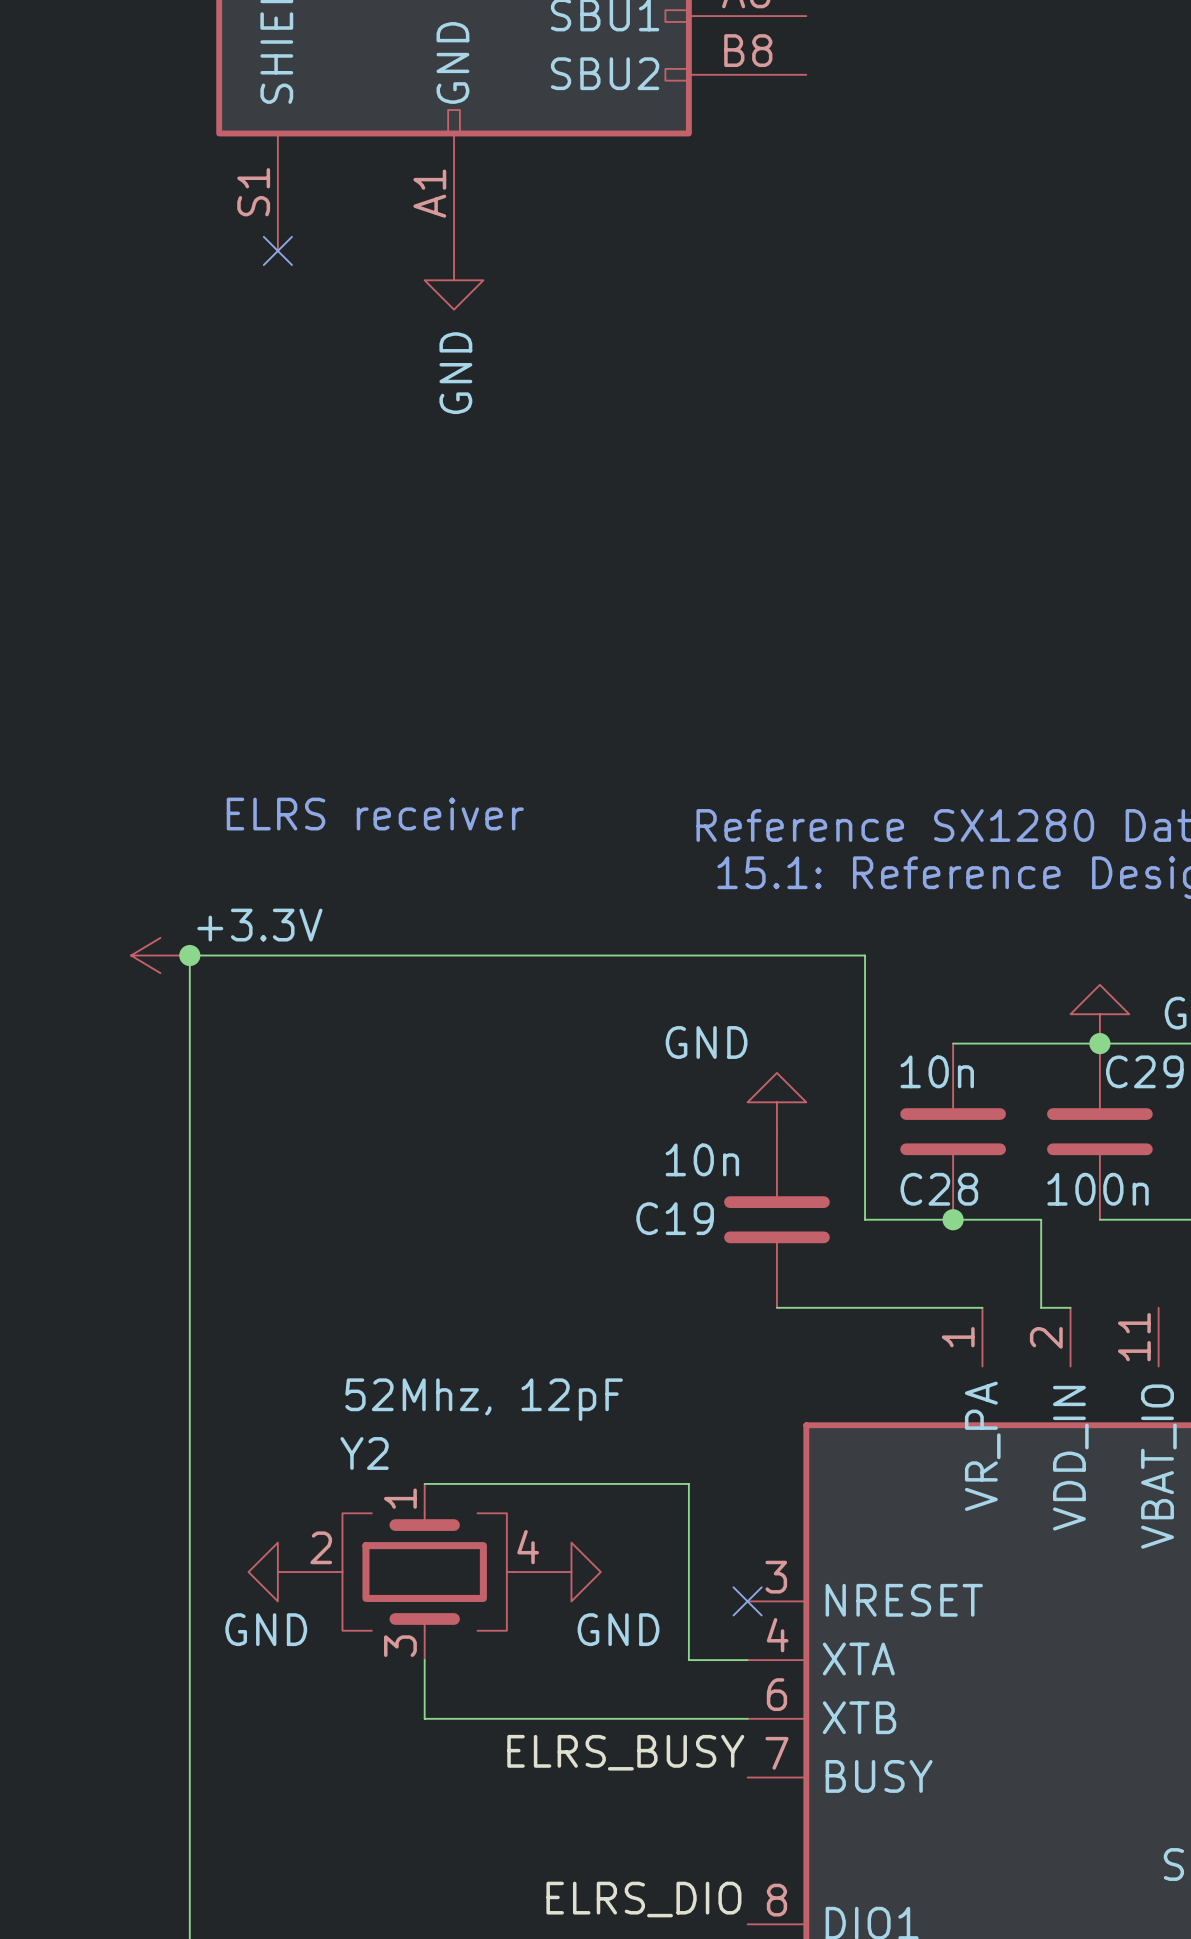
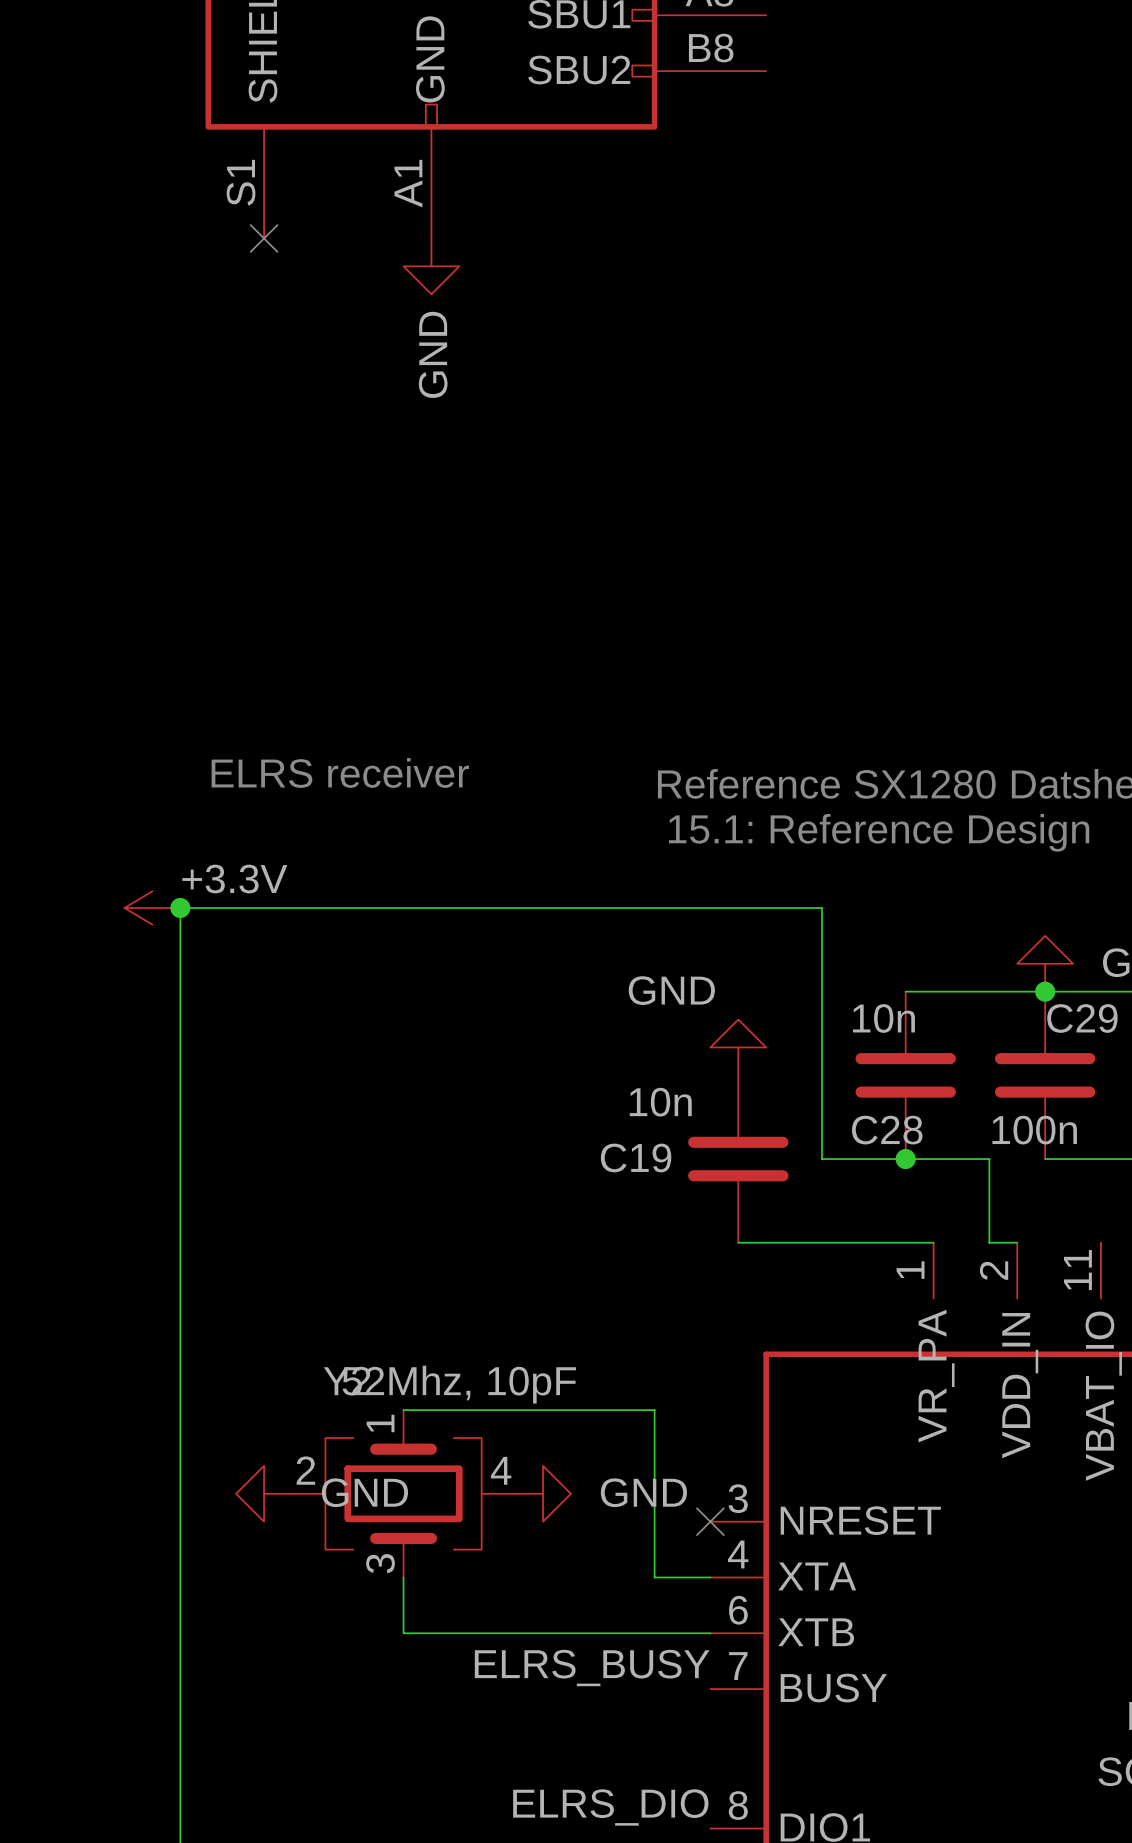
Y2 value: 52Mhz, 12pF (484, 1399) -> 52Mhz, 10pF (459, 1384)
power symbol text position: GND (266, 1629) -> GND (364, 1492)
power symbol text position: GND (618, 1629) -> GND (643, 1492)

